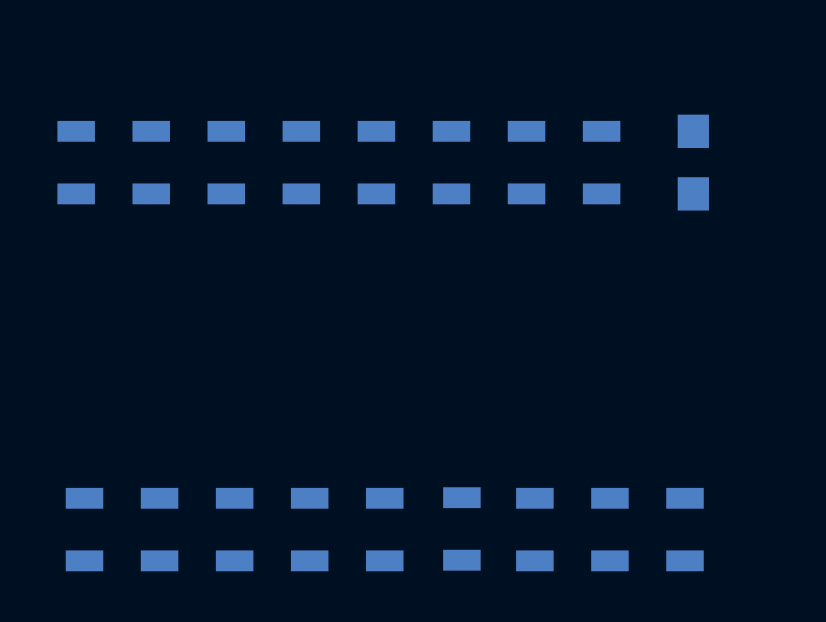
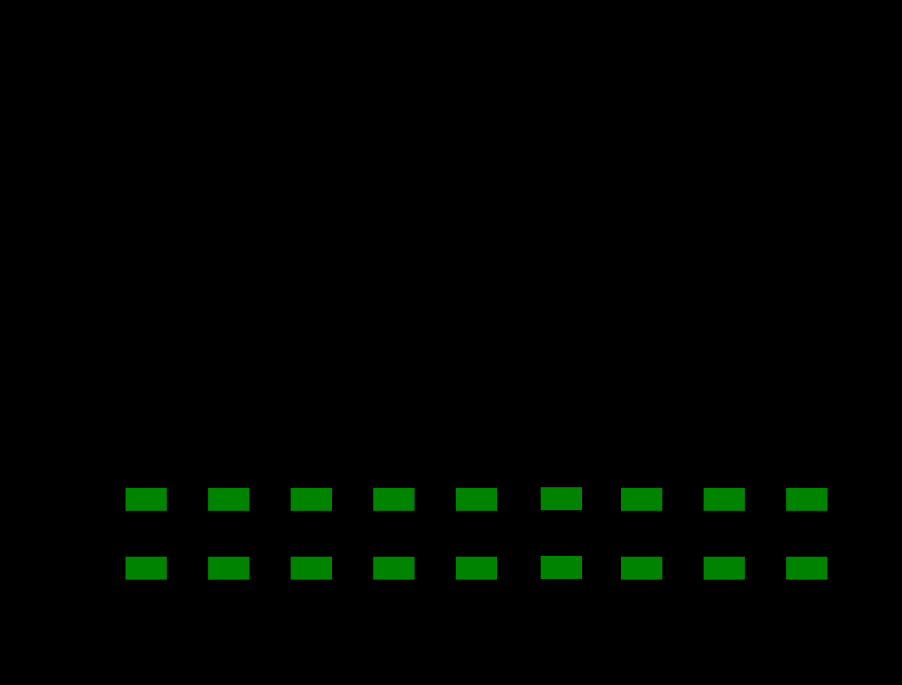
part: (76, 162) -> none
part: (151, 162) -> none
part: (226, 162) -> none
part: (301, 162) -> none
part: (376, 162) -> none
part: (451, 162) -> none
part: (526, 162) -> none
part: (601, 162) -> none
part: (693, 162) -> none

